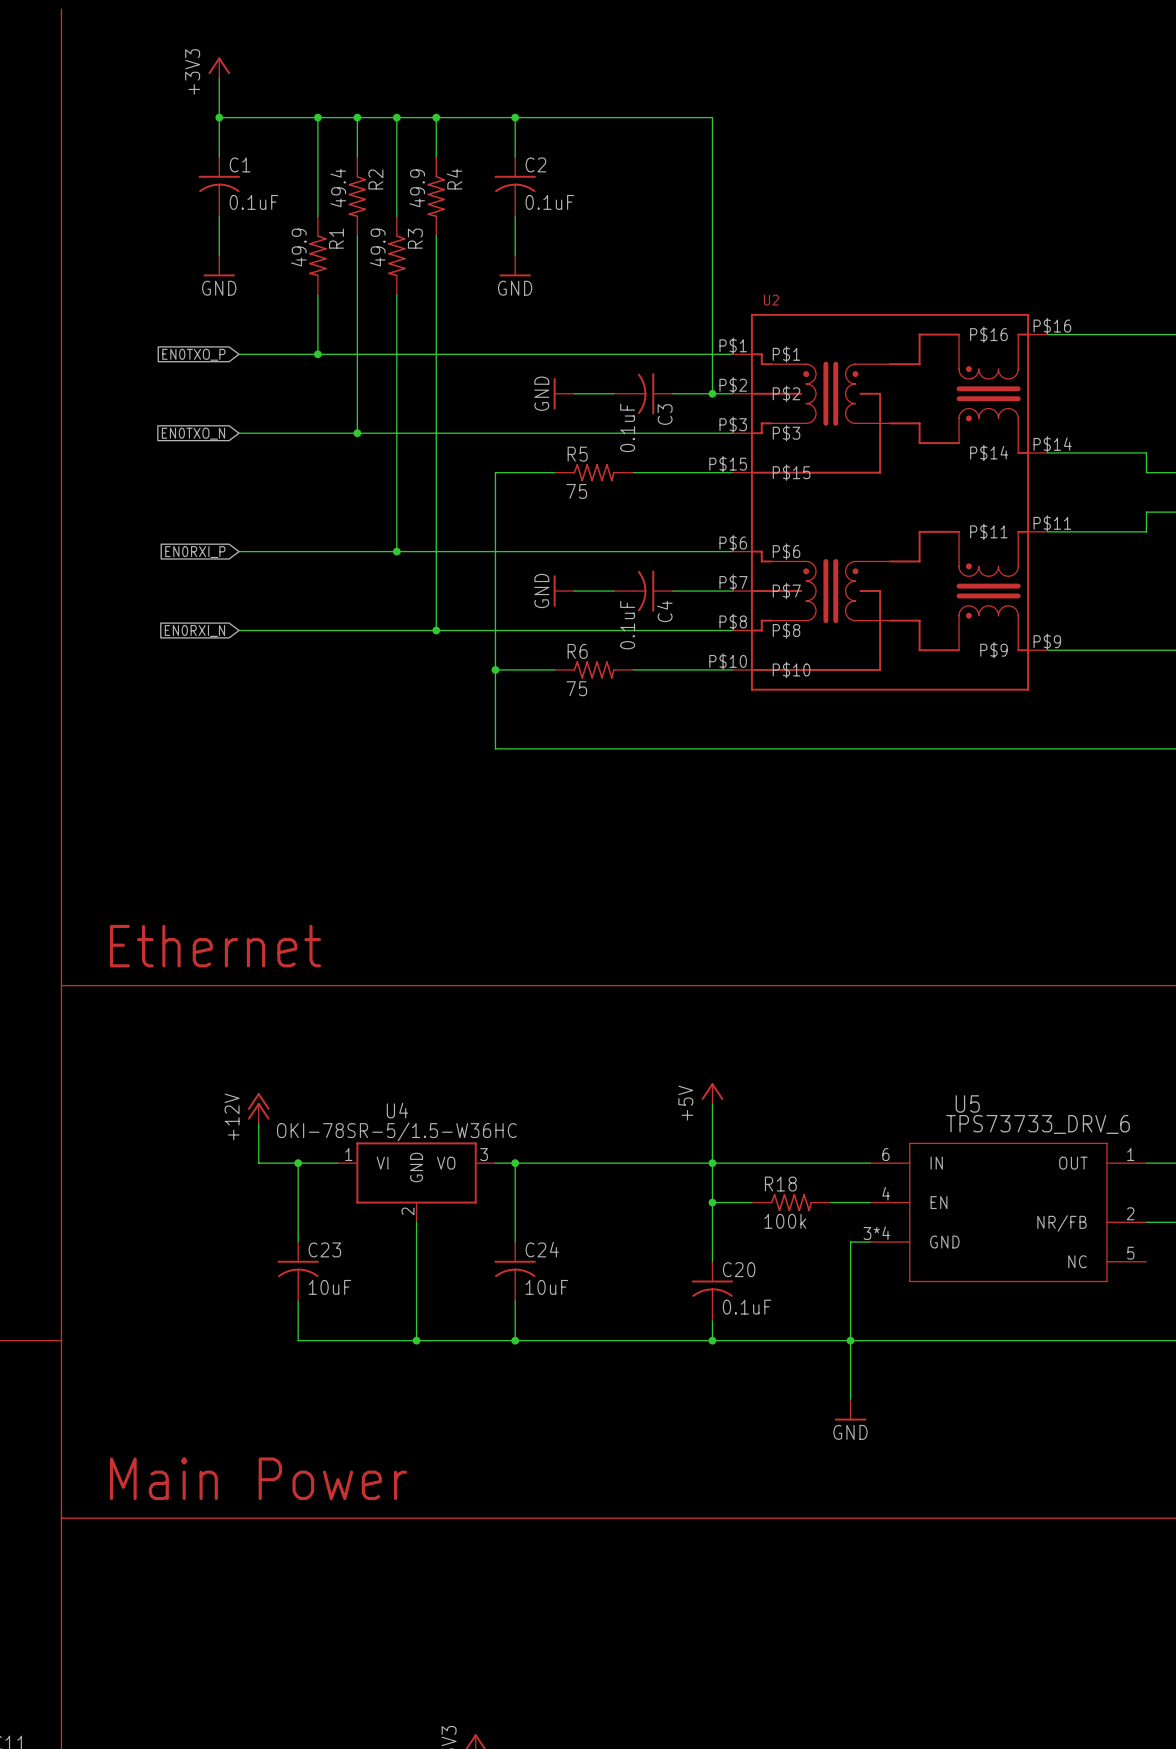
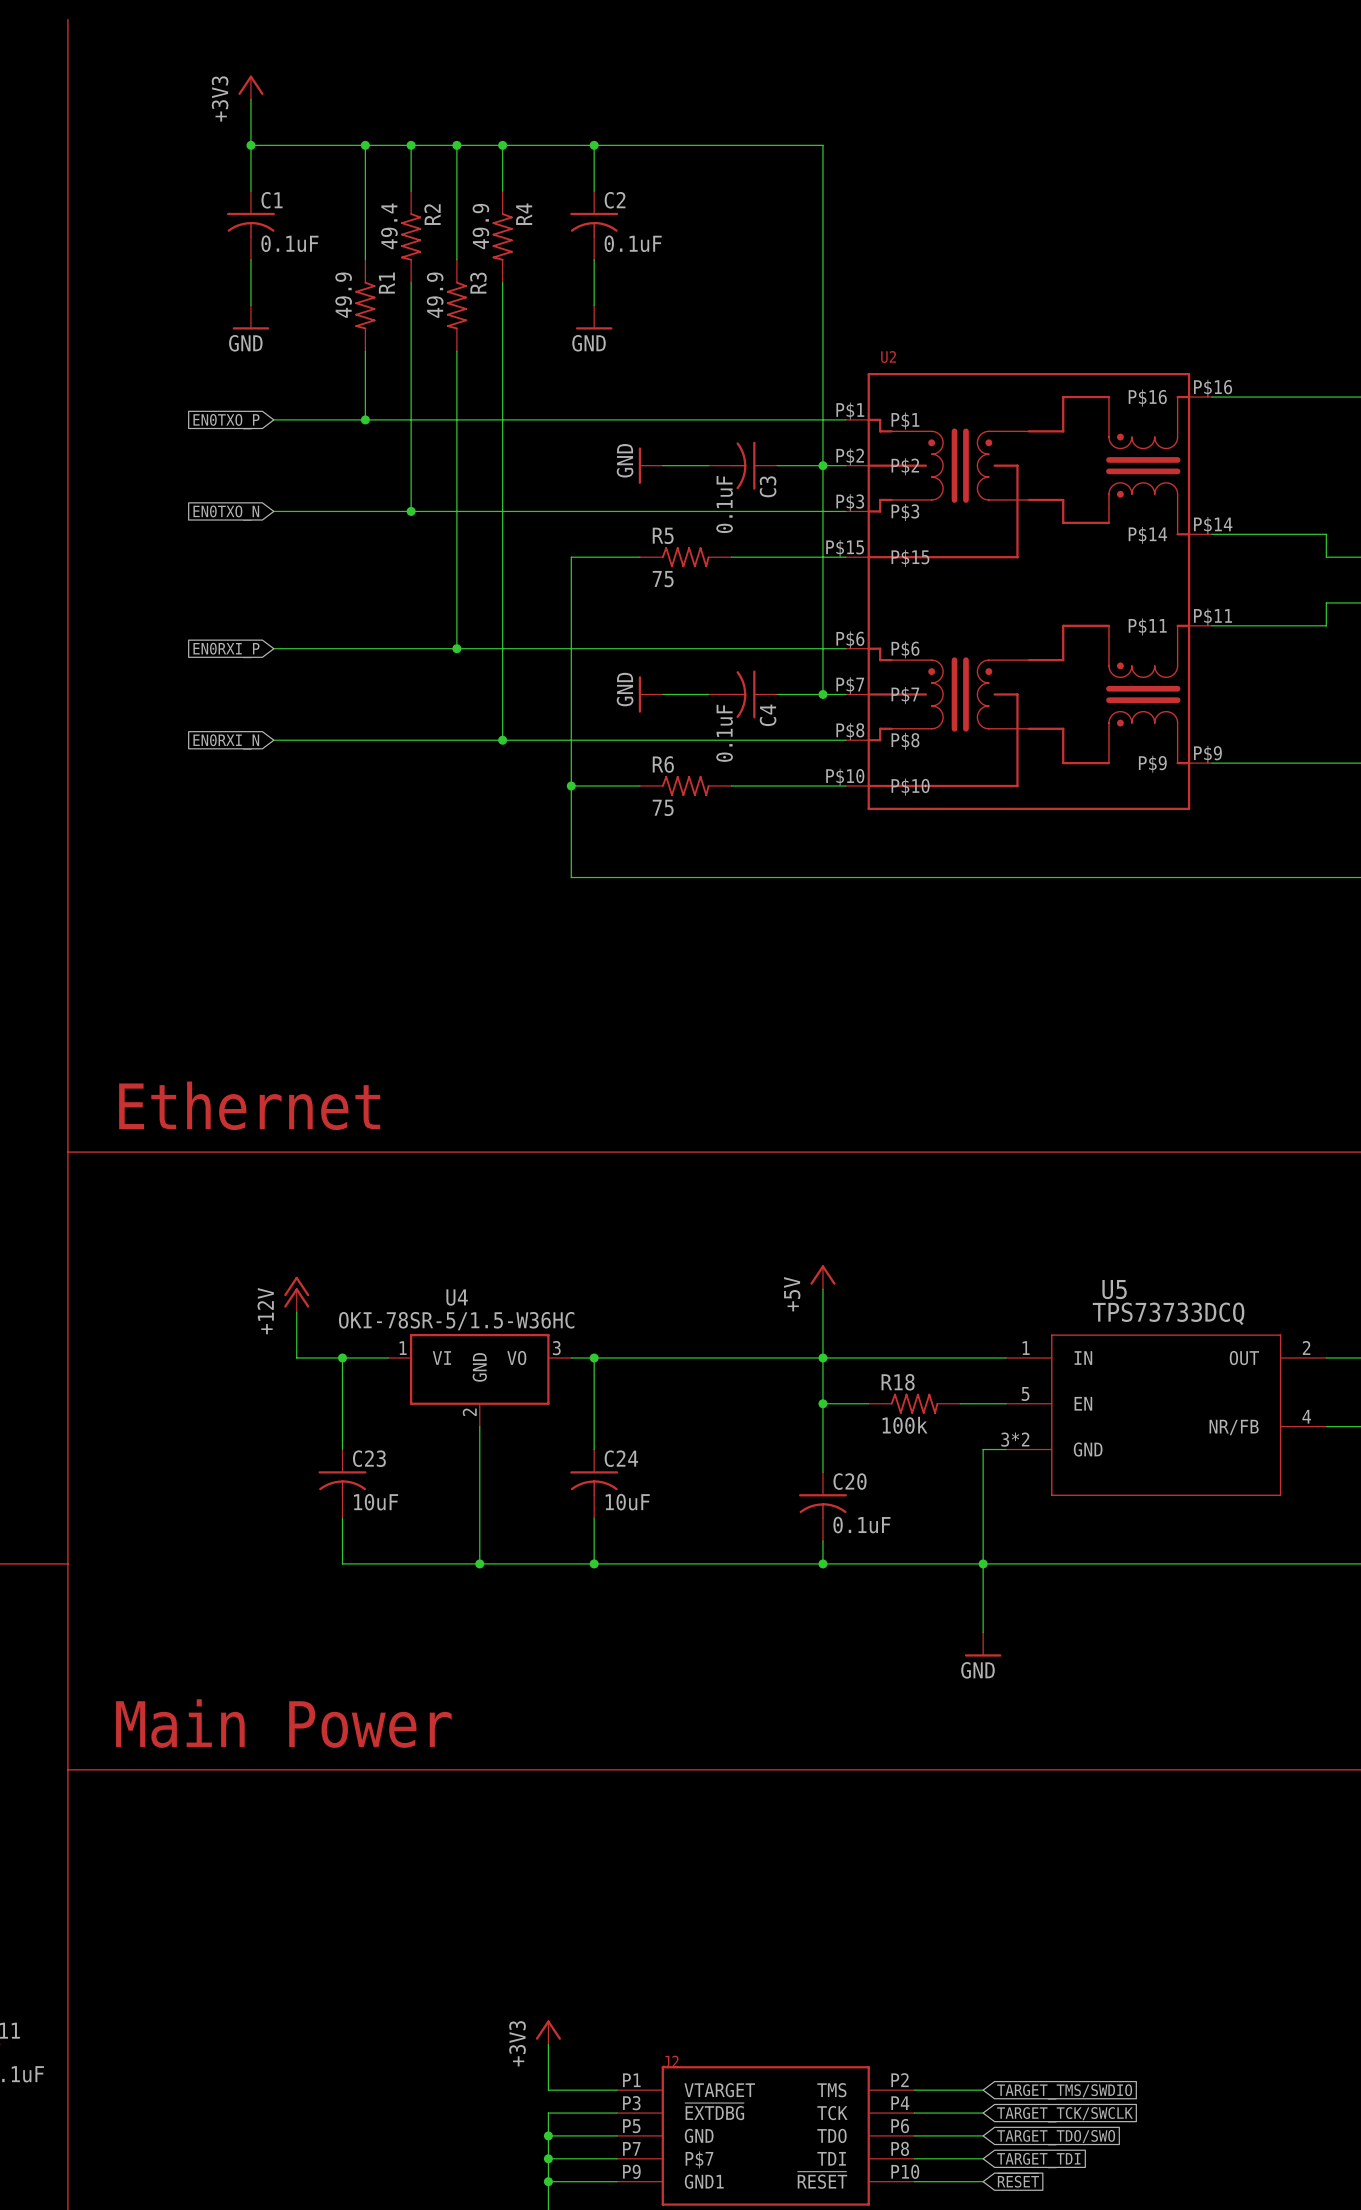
wire: none -> (822, 465) (822, 694)
junction: none -> (822, 694)
U5 value: TPS73733_DRV_6 (1038, 1124) -> TPS73733DCQ (1168, 1313)
U5 symbol: [870, 1142, 1147, 1283] -> [1006, 1334, 1327, 1496]

